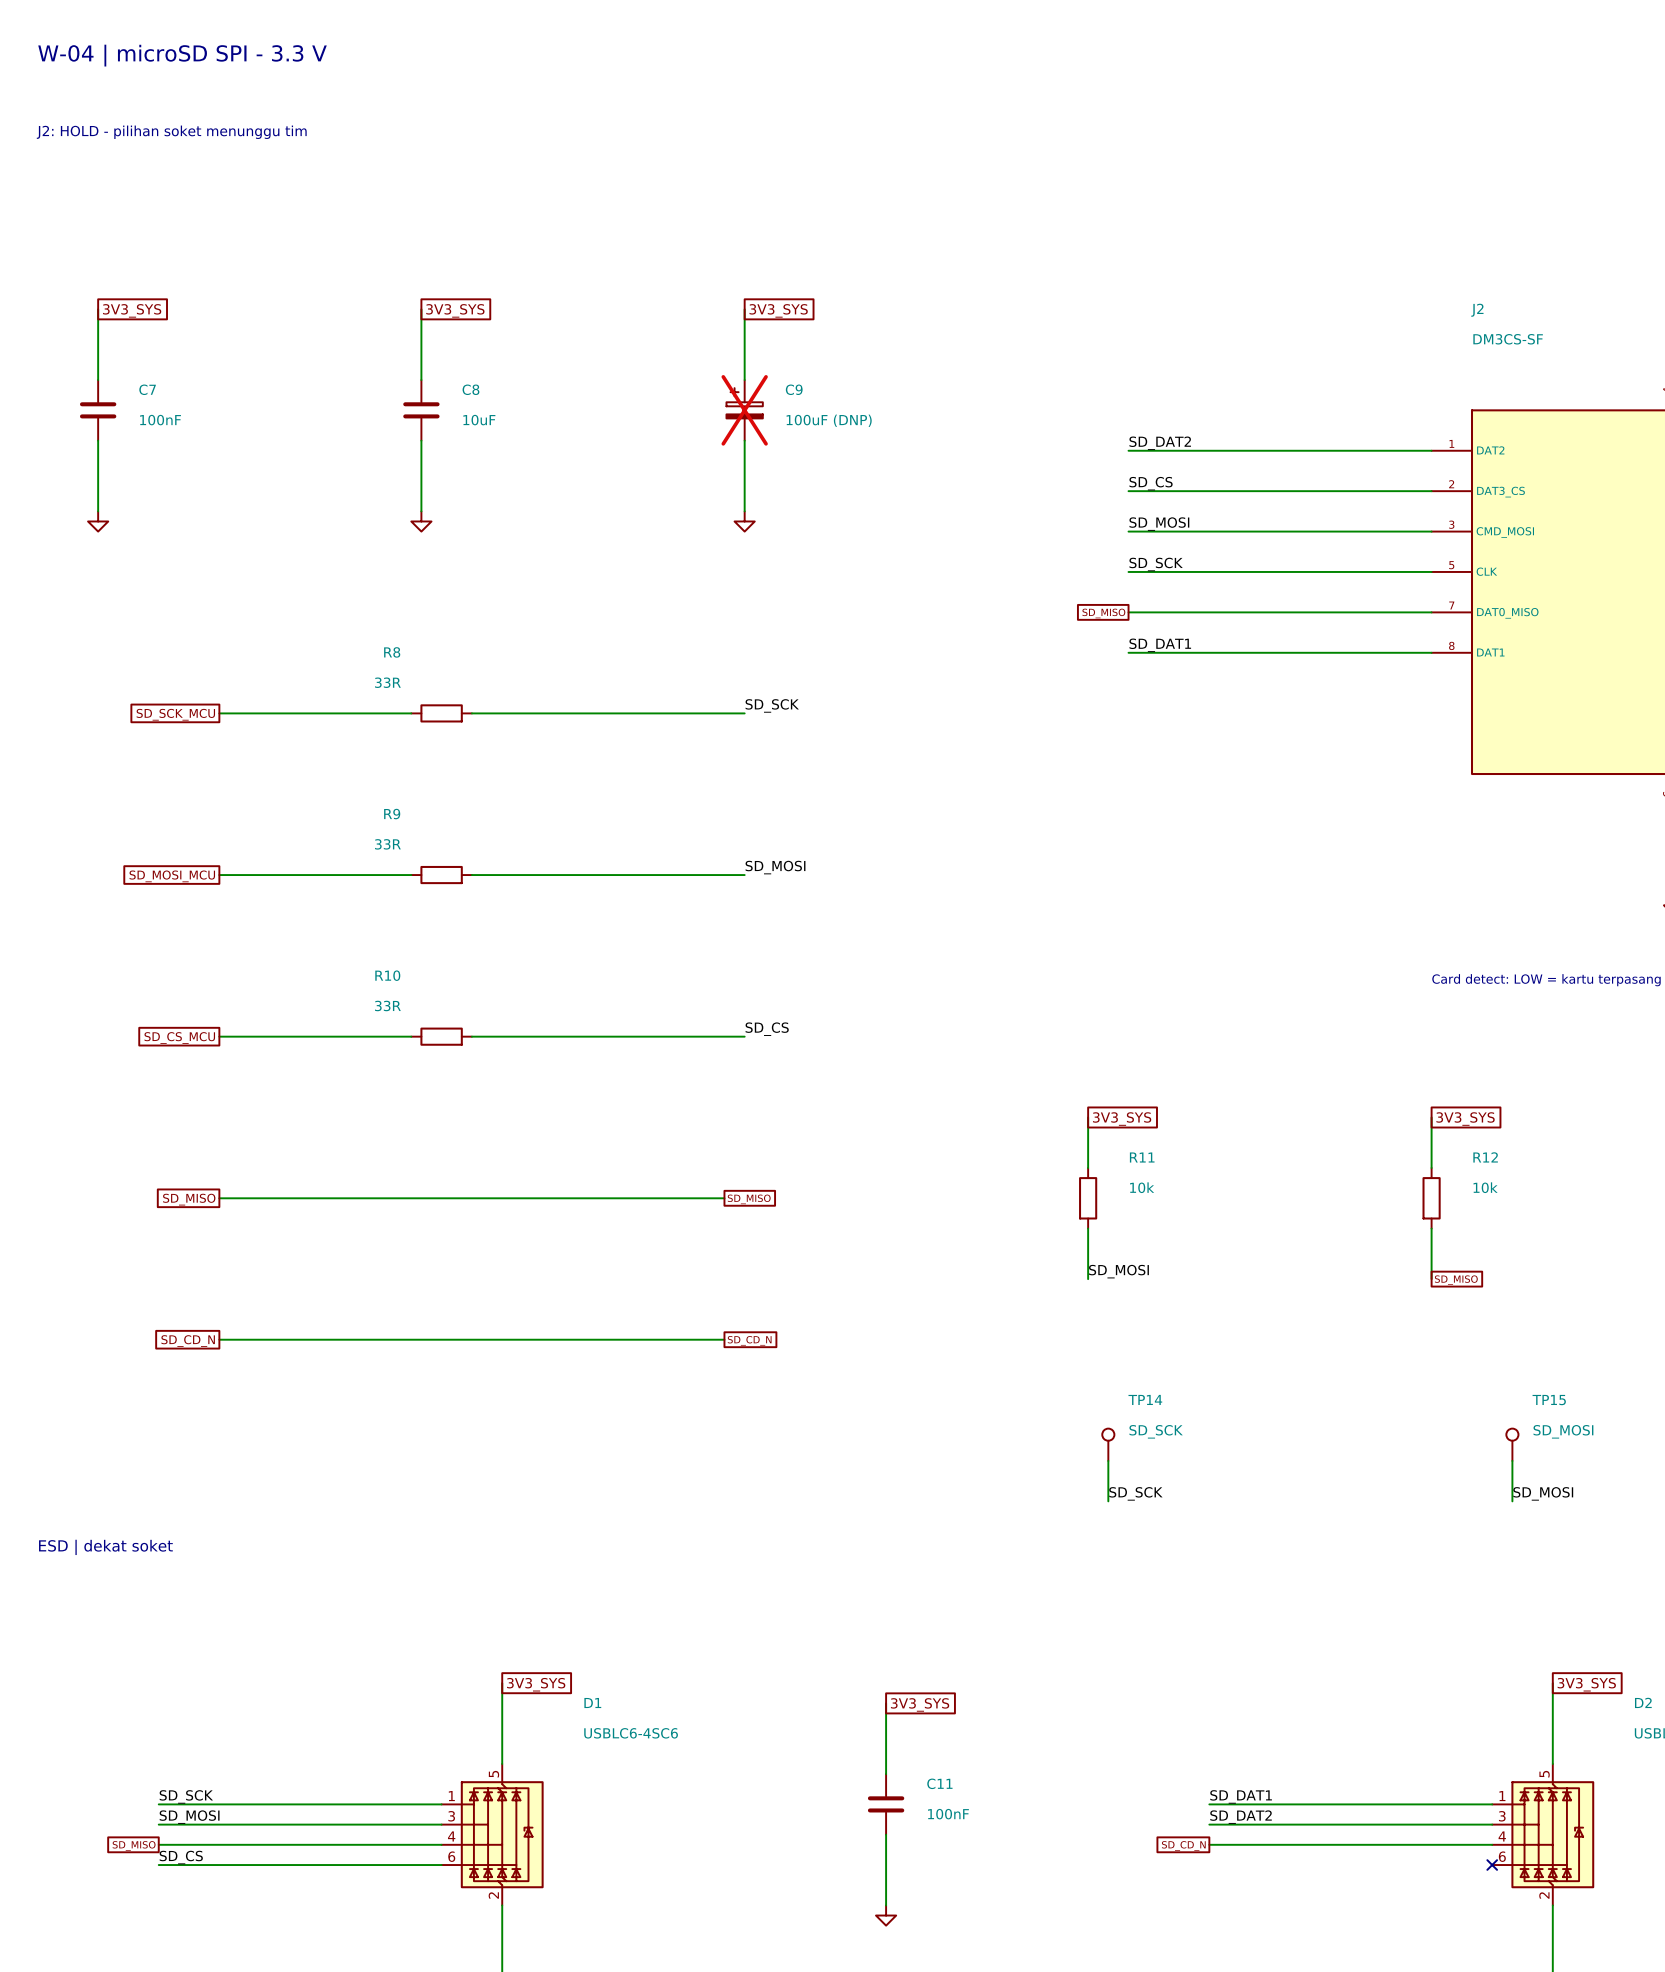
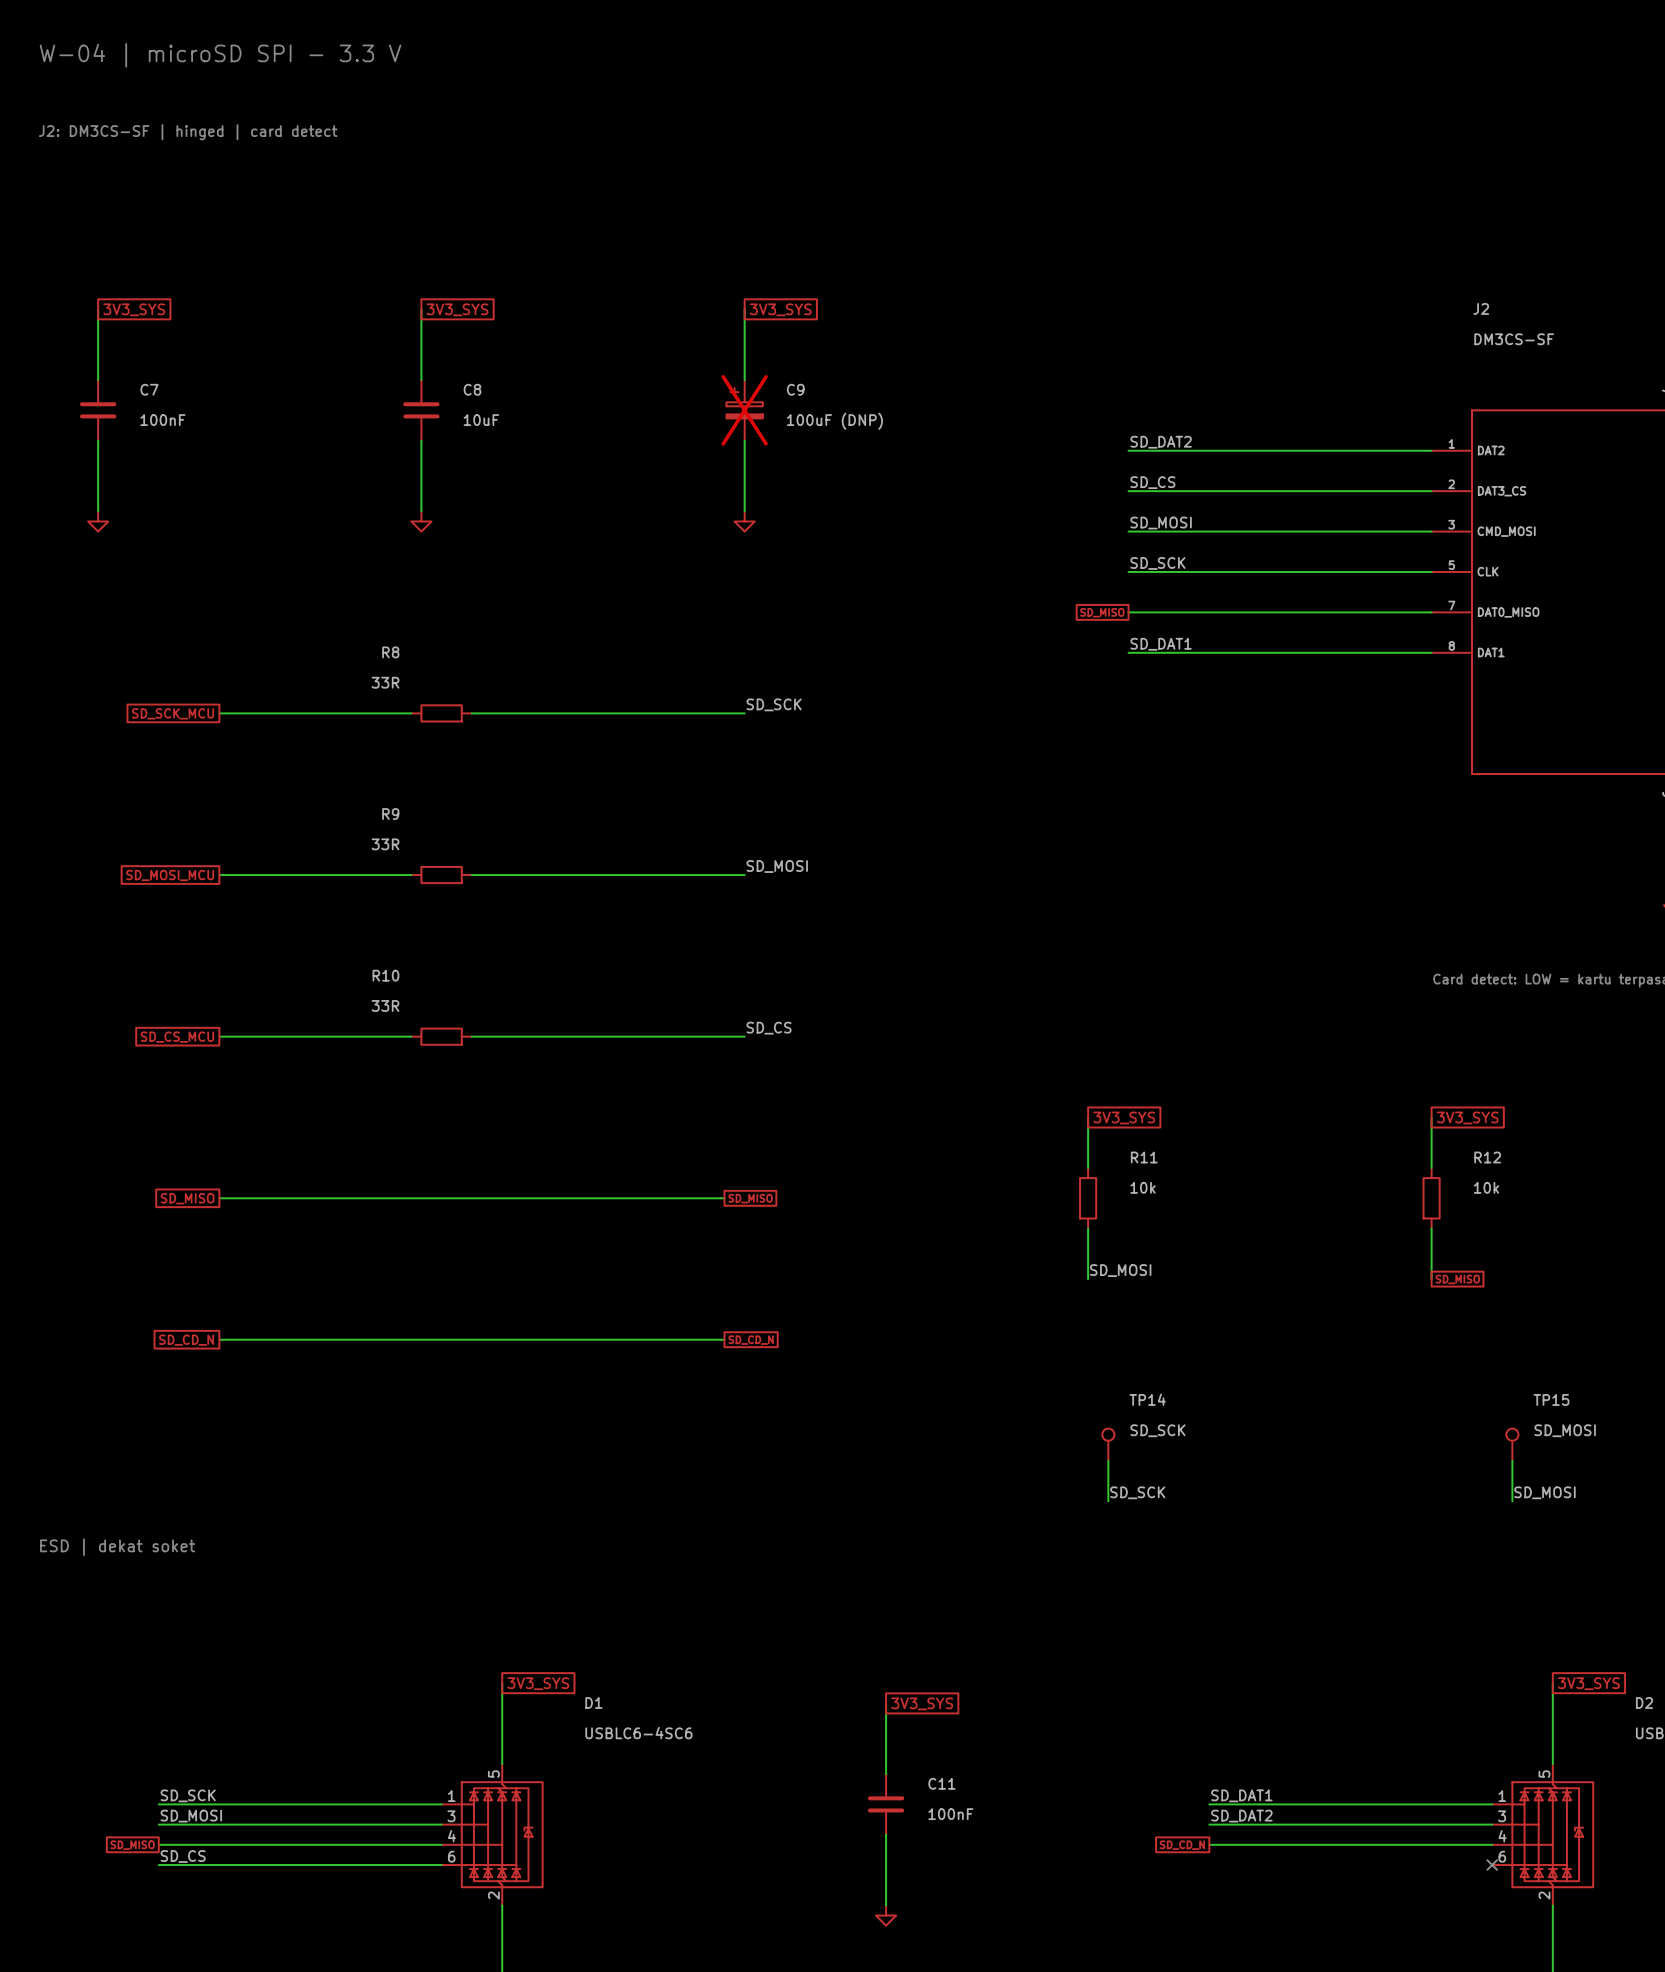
text: J2: HOLD - pilihan soket menunggu tim (171, 132) -> J2: DM3CS-SF | hinged | card detect (188, 132)

